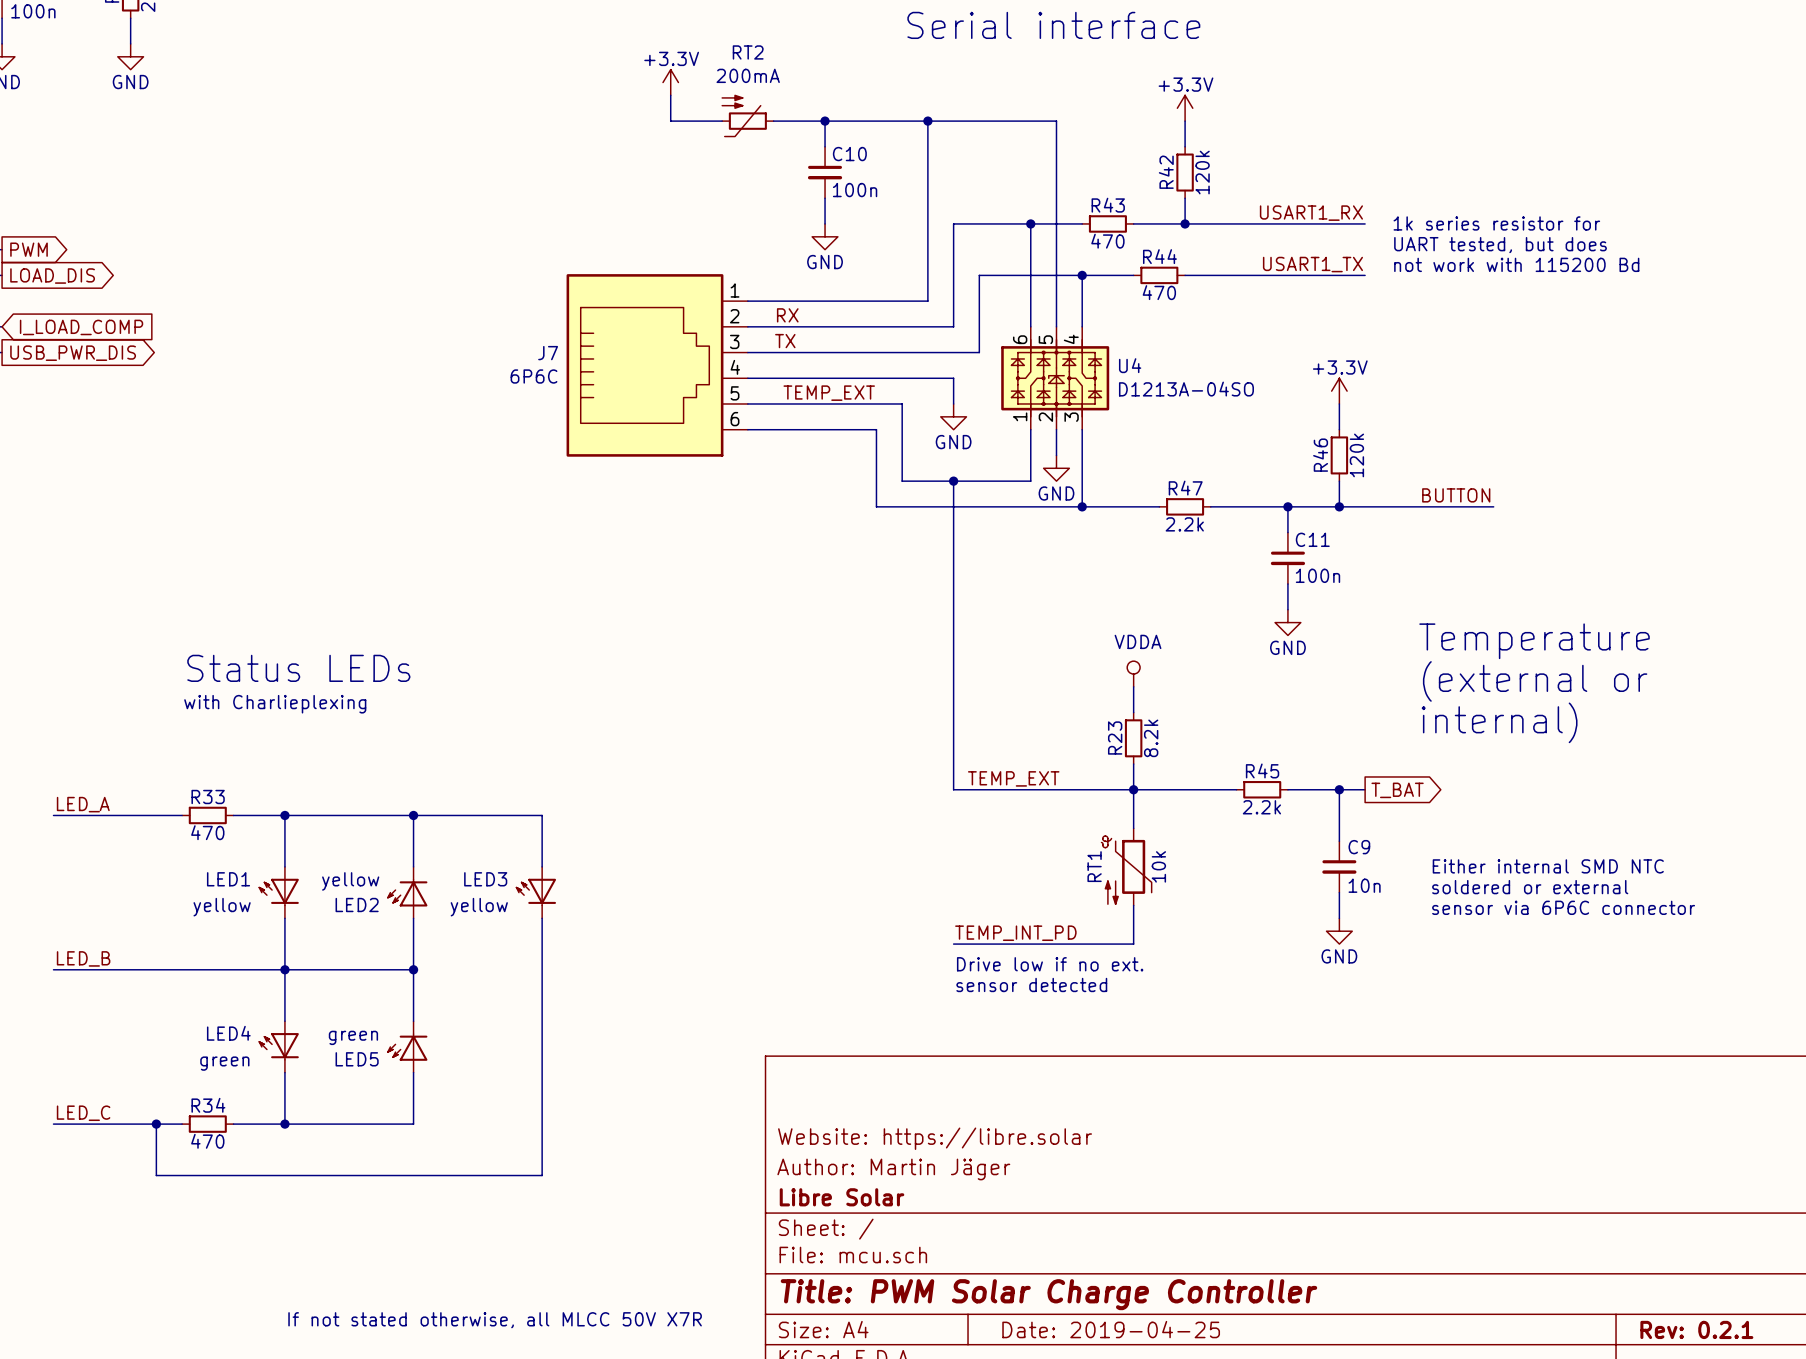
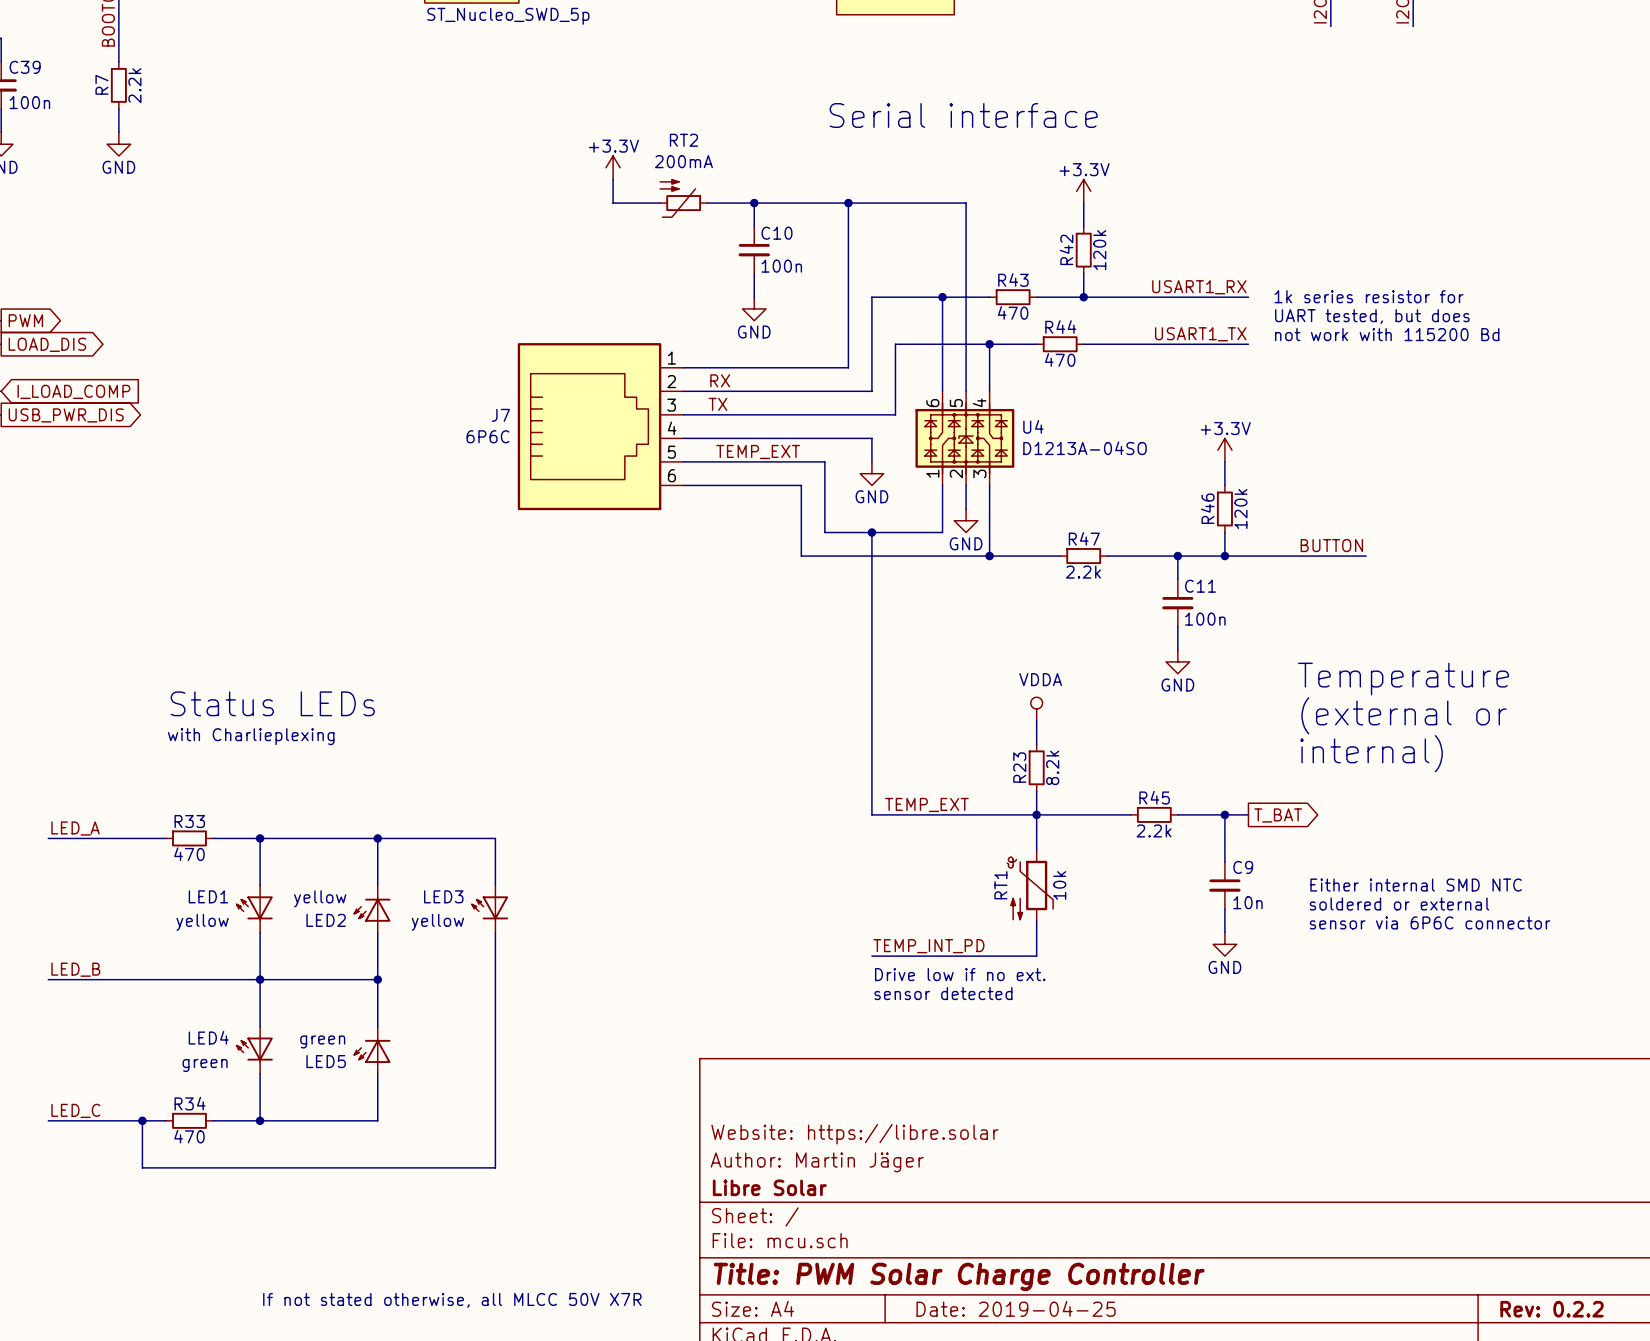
title block: Rev: 0.2.1 (1696, 1329) -> Rev: 0.2.2 (1552, 1309)

